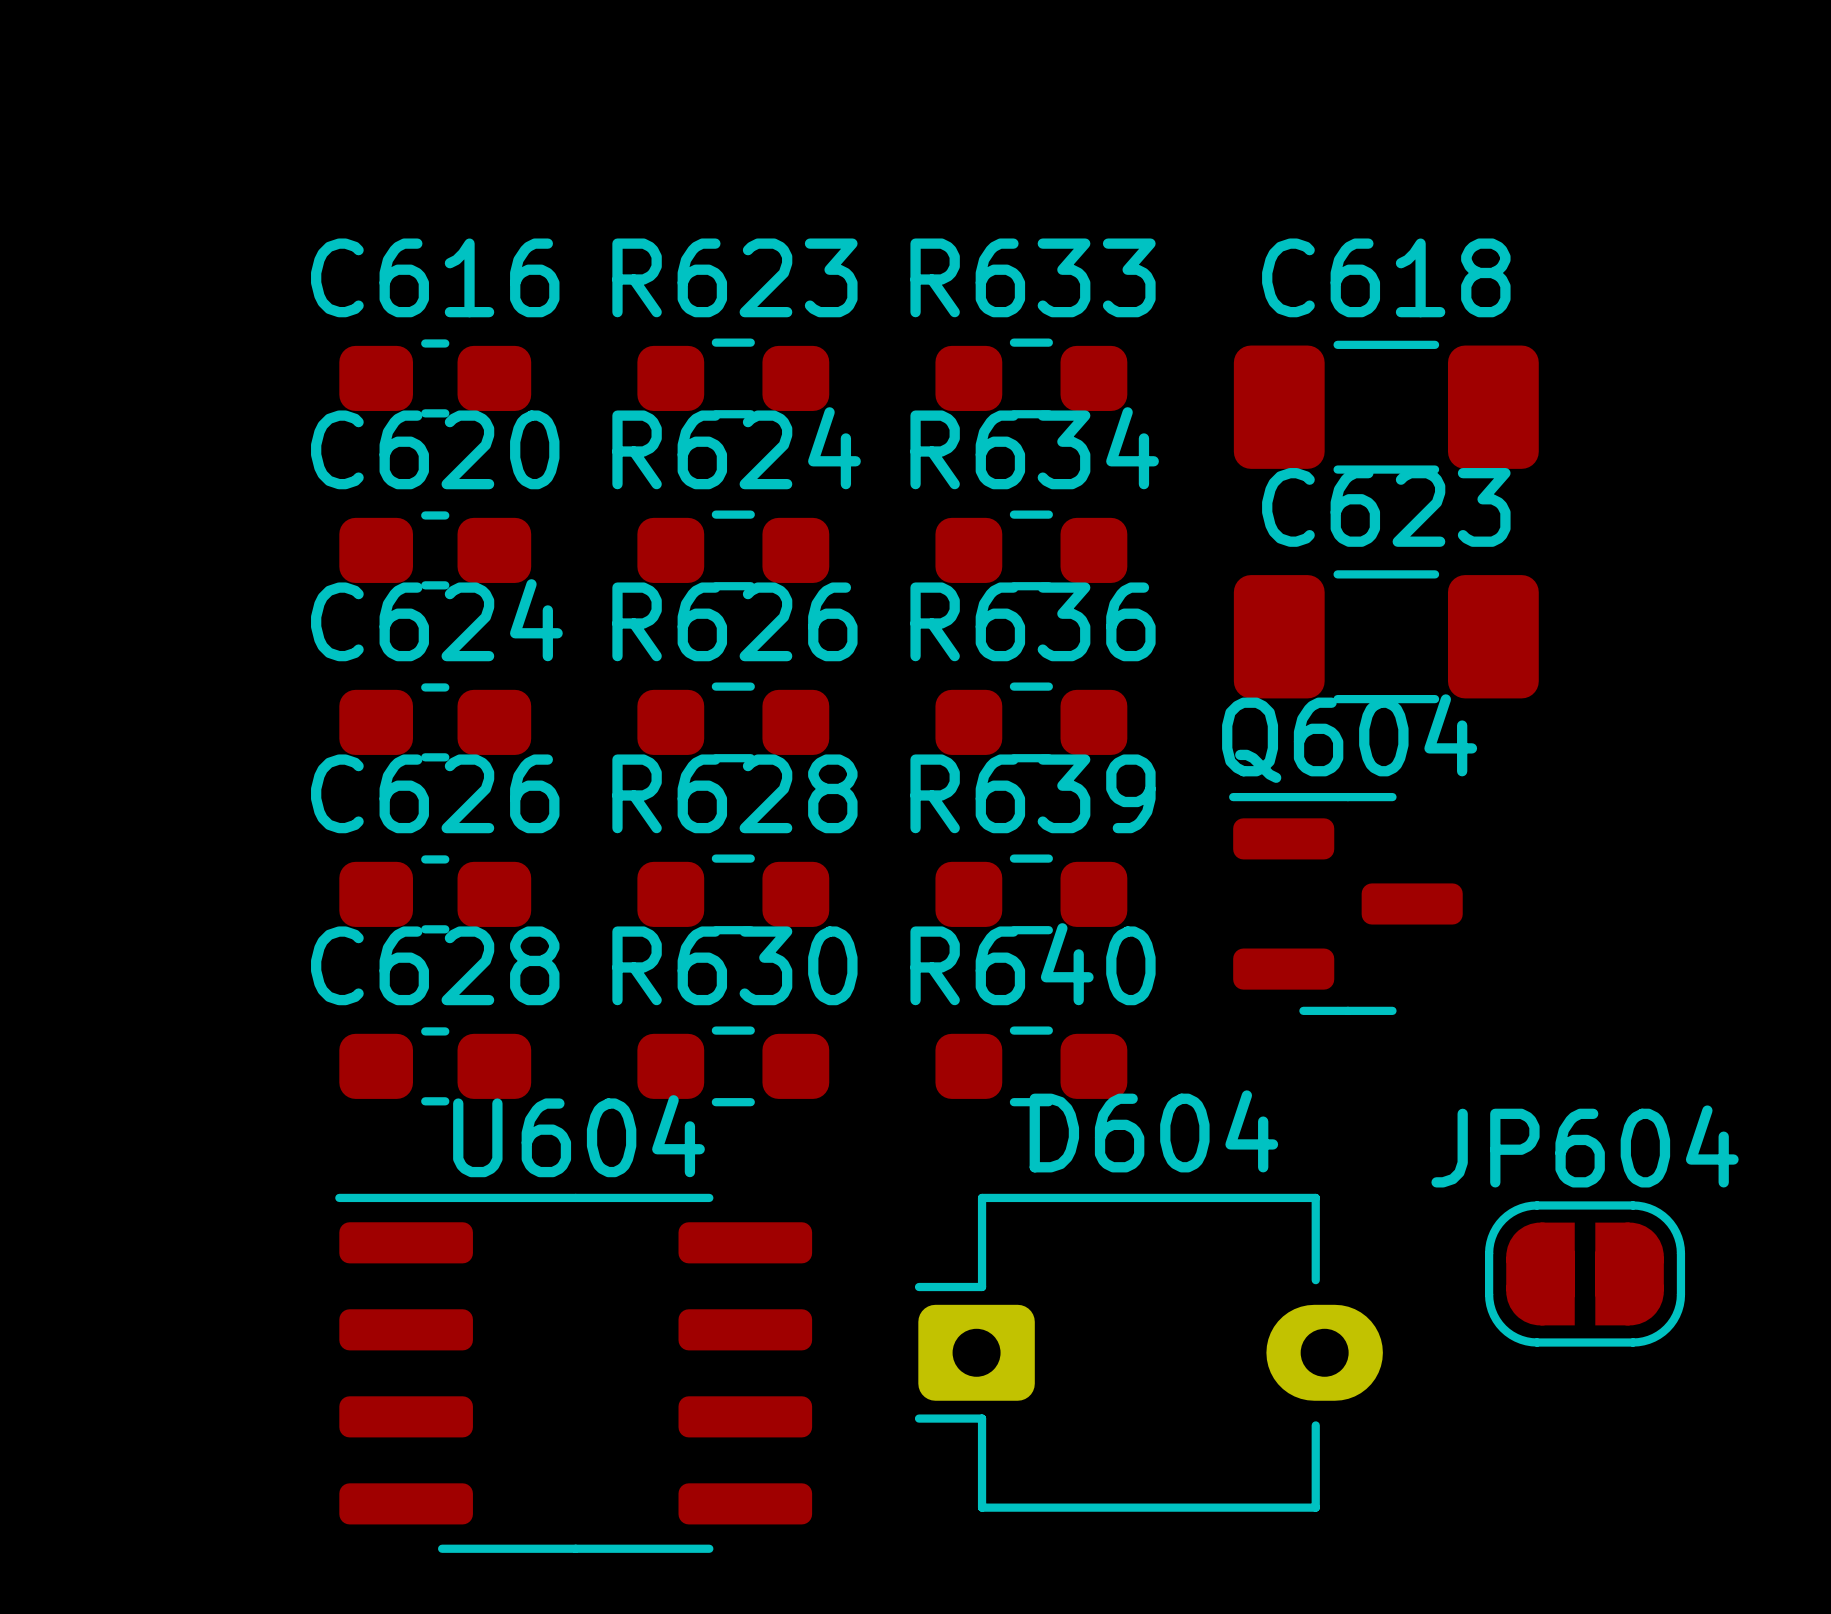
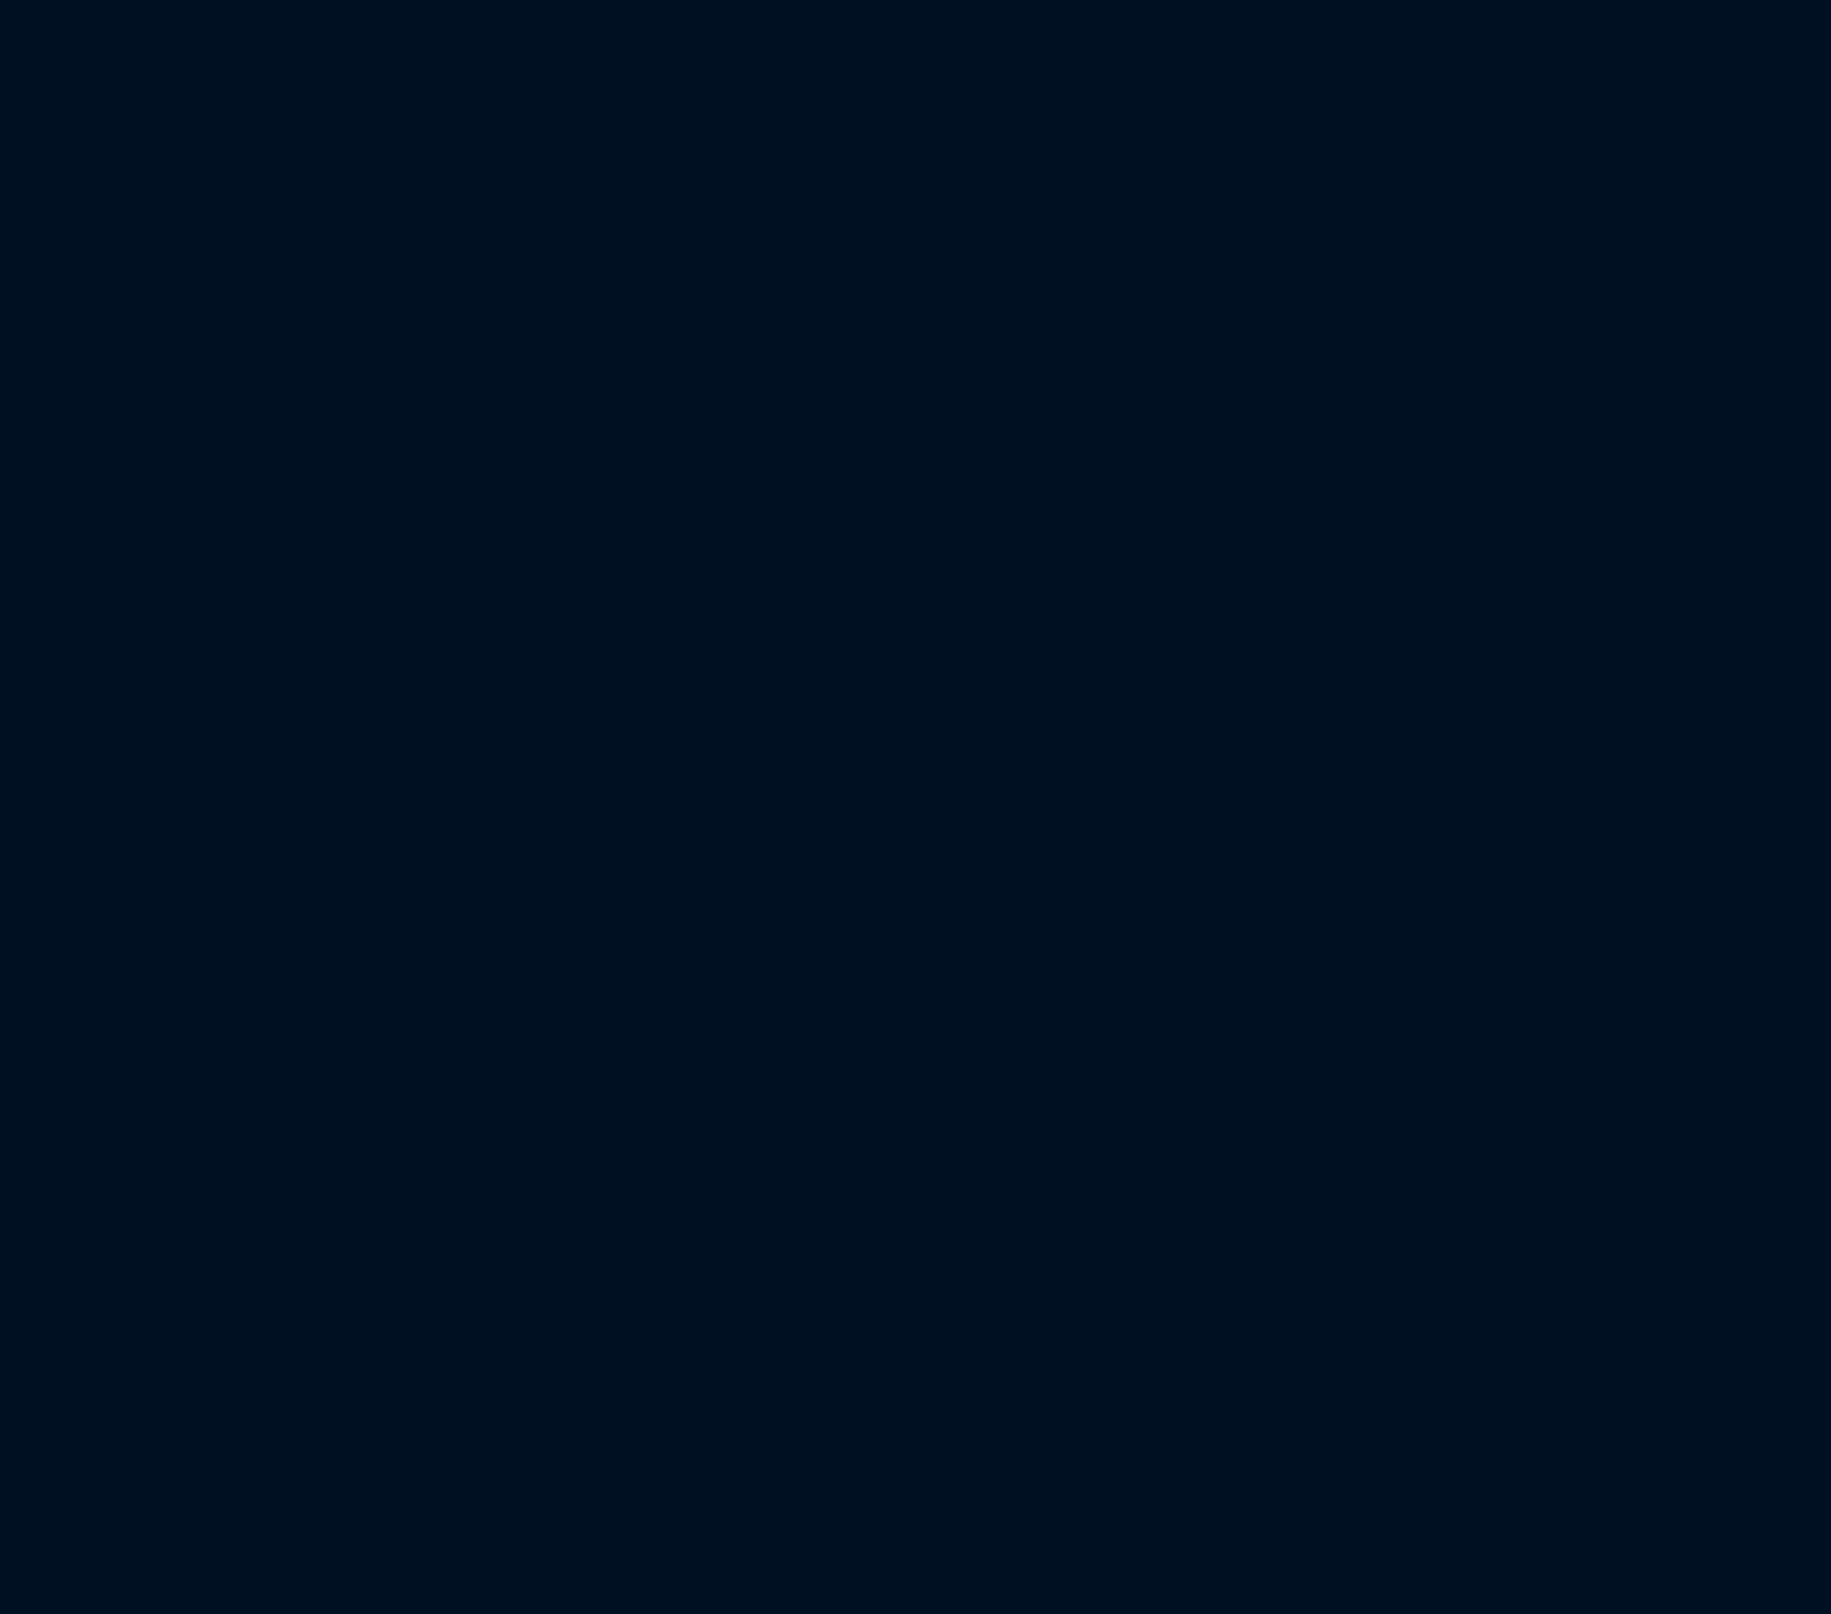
C616: (435, 378) -> none
R623: (733, 378) -> none
R633: (1031, 378) -> none
C618: (1386, 407) -> none
C620: (435, 550) -> none
R624: (733, 550) -> none
R634: (1031, 550) -> none
C623: (1386, 636) -> none
C624: (435, 722) -> none
R626: (733, 722) -> none
R636: (1031, 722) -> none
C626: (435, 894) -> none
R628: (733, 894) -> none
R639: (1031, 894) -> none
Q604: (1345, 903) -> none
C628: (435, 1066) -> none
R630: (733, 1066) -> none
R640: (1031, 1066) -> none
JP604: (1585, 1273) -> none
D604: (1148, 1352) -> none
U604: (573, 1373) -> none

